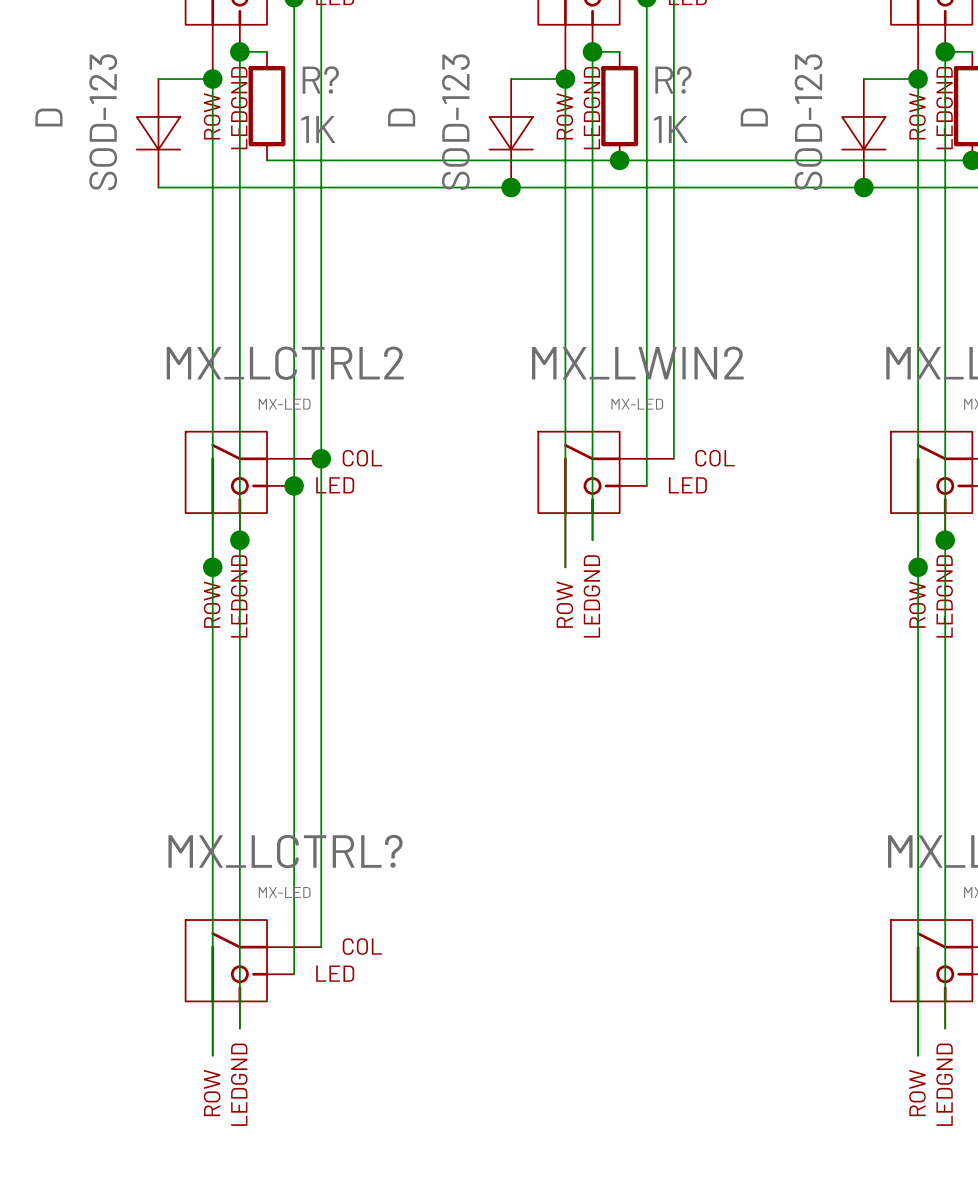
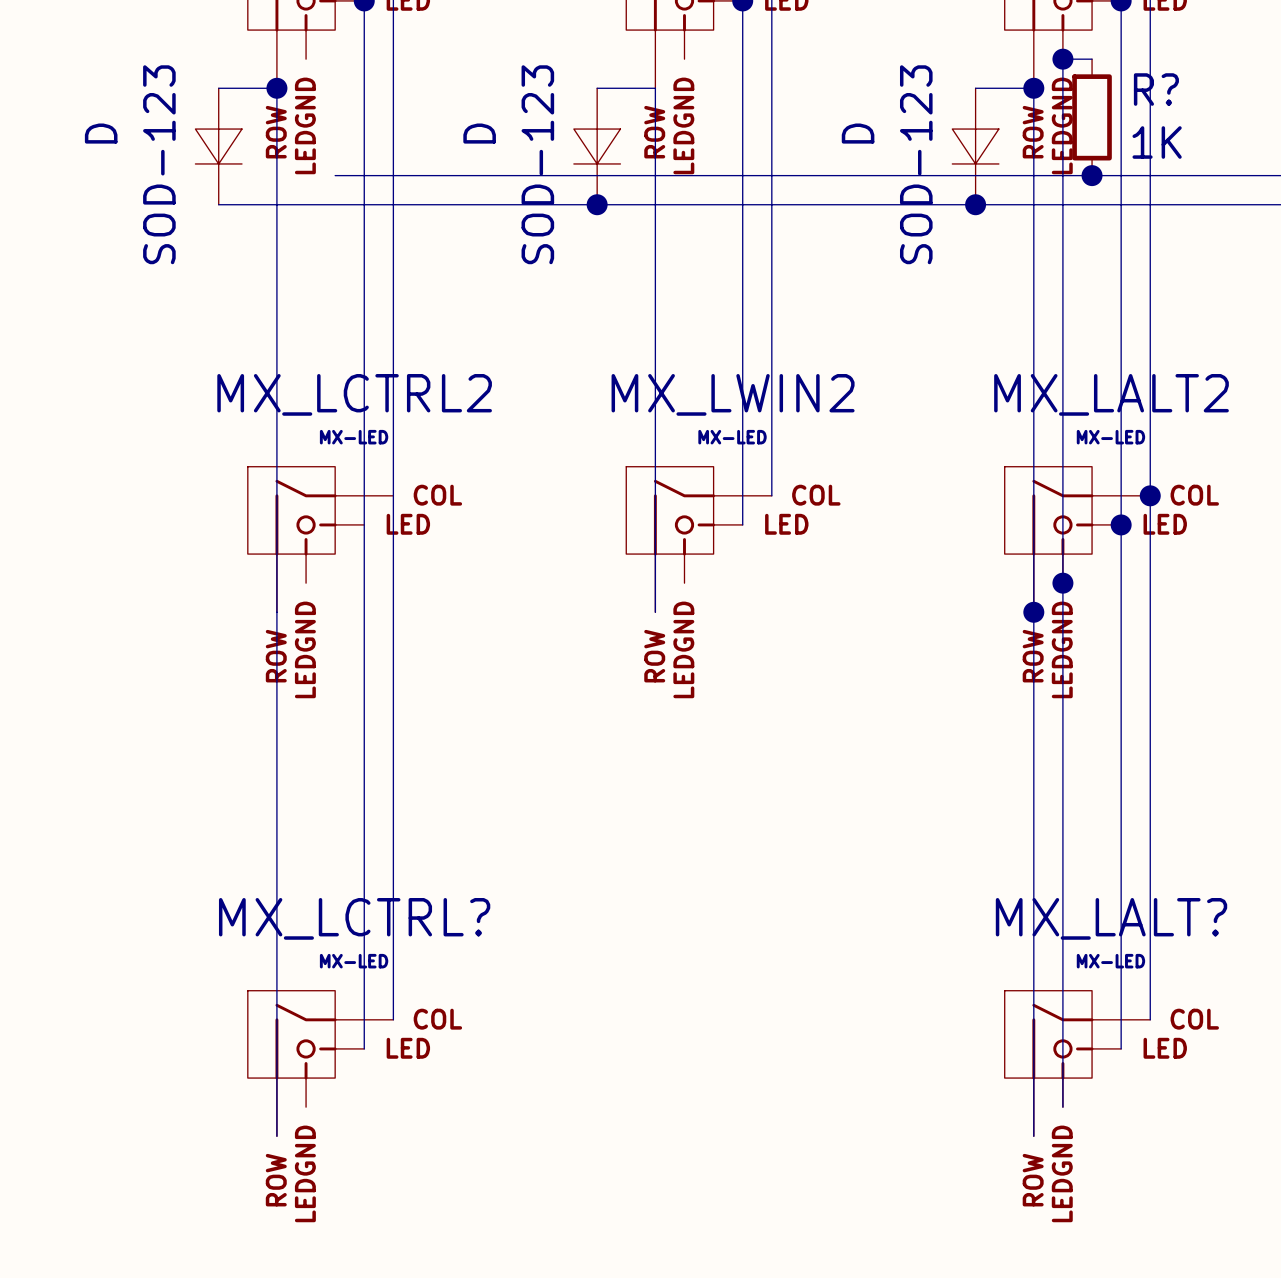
junction: (239, 51) -> none
wire: (267, 51) (239, 51) (239, 1028) -> none
junction: (592, 51) -> none
wire: (619, 51) (592, 51) (592, 540) -> none
junction: (565, 79) -> none
R?: 1K (267, 106) -> none
R?: 1K (619, 106) -> none
junction: (619, 160) -> none
junction: (321, 458) -> none
junction: (294, 485) -> none
junction: (239, 540) -> none
junction: (212, 567) -> none

